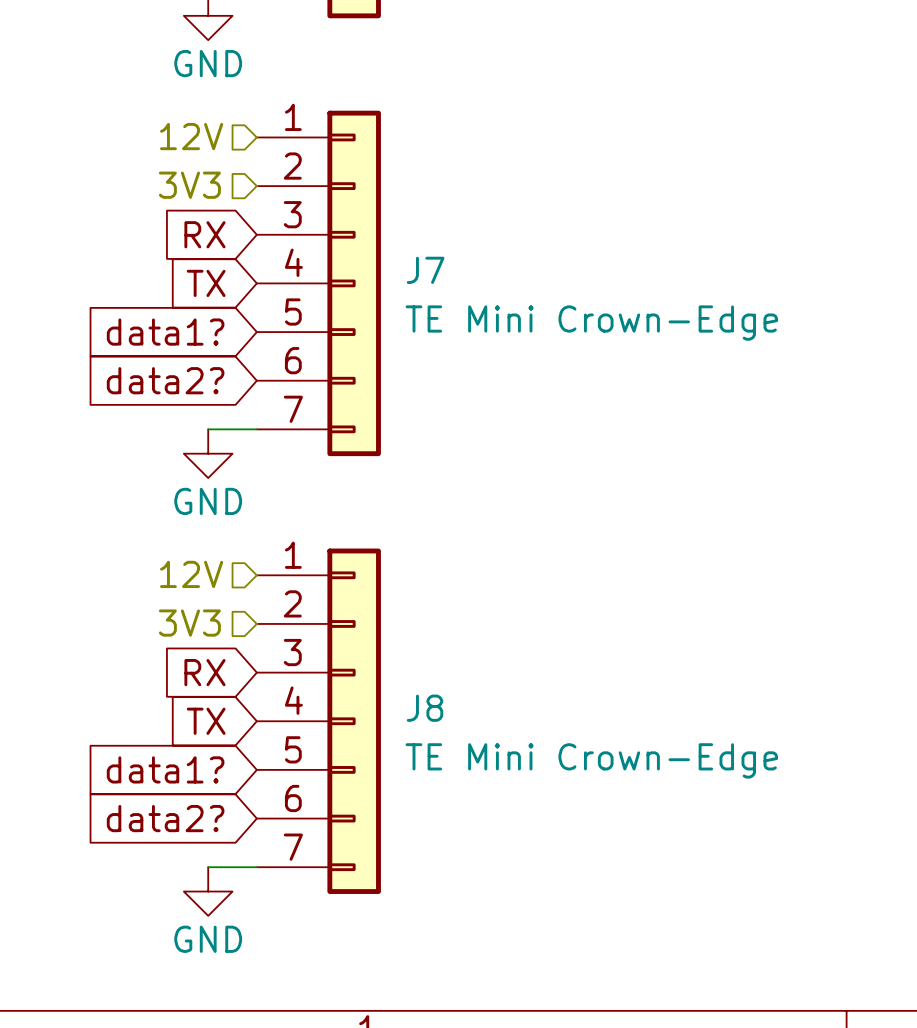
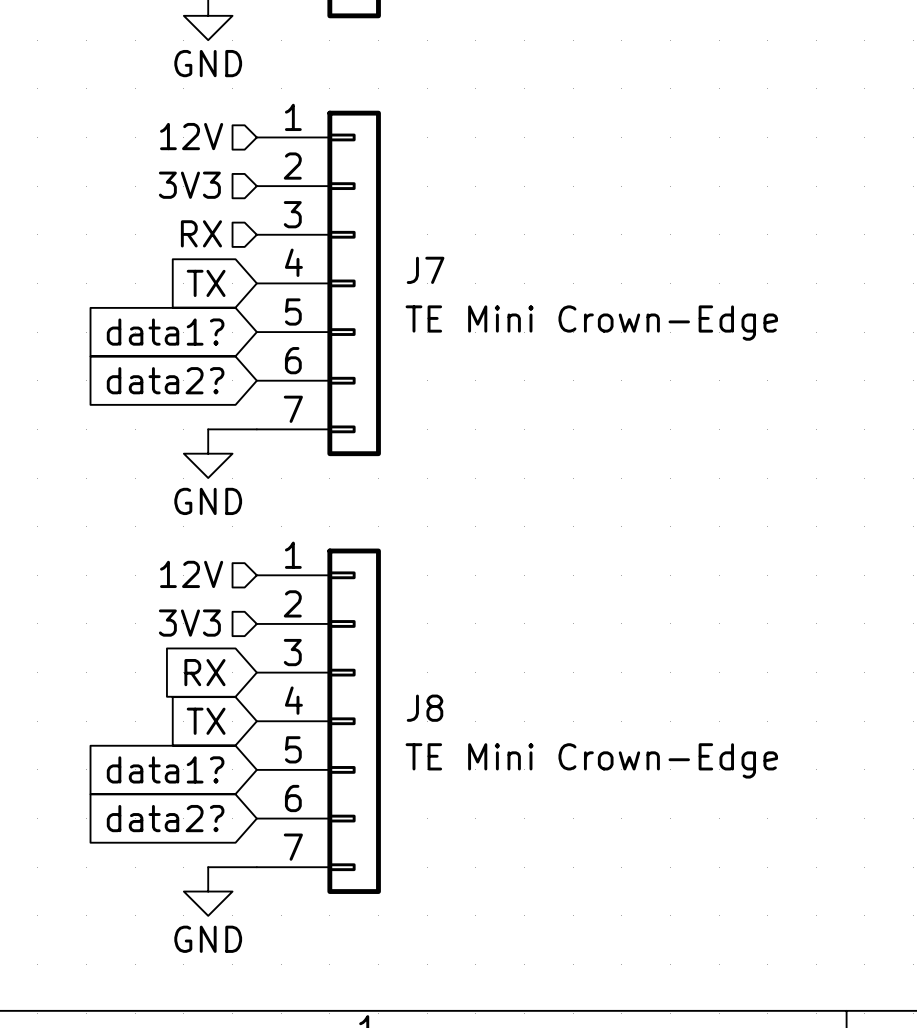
hierarchical label: none -> RX (201, 233)
global label: RX (204, 234) -> none

